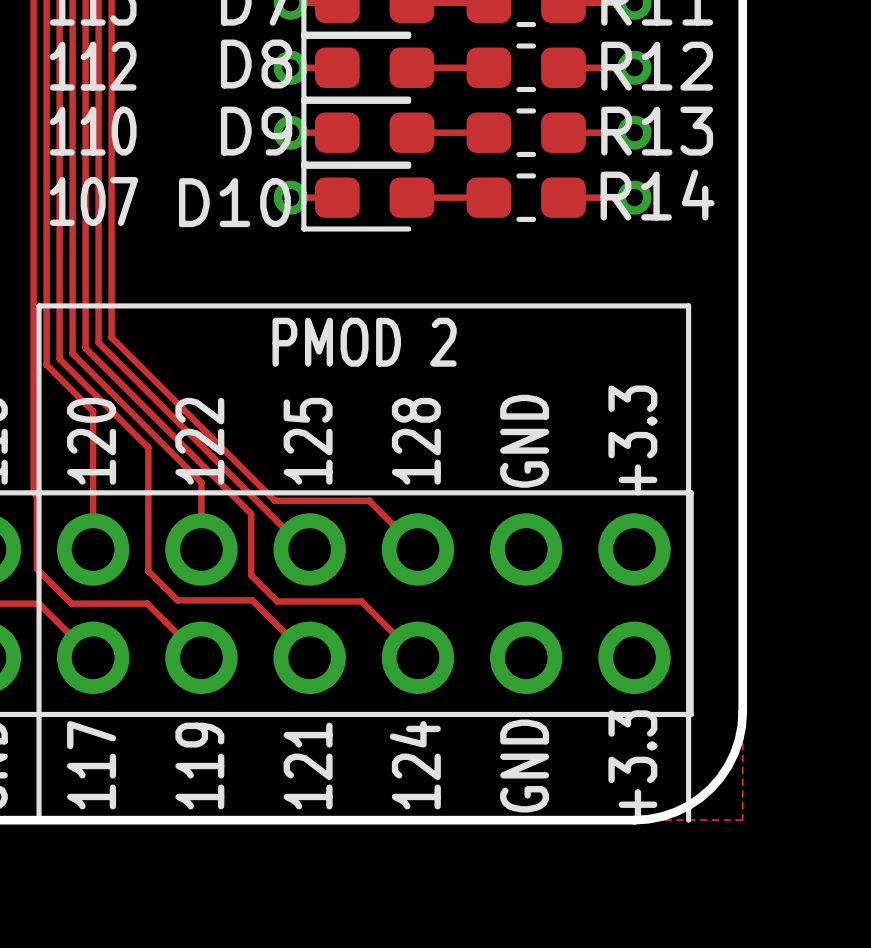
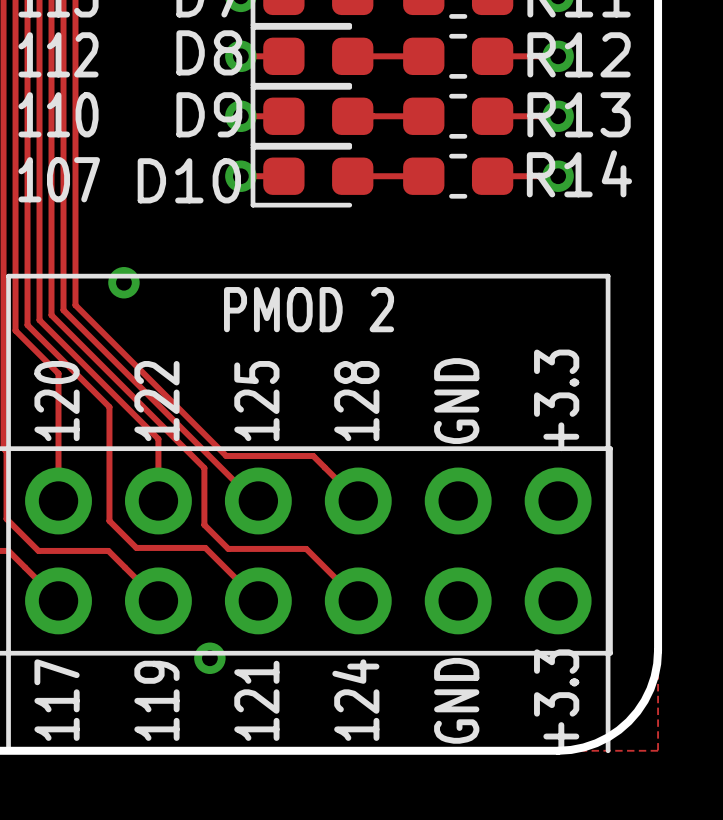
via: none -> (123, 282)
via: none -> (209, 658)

